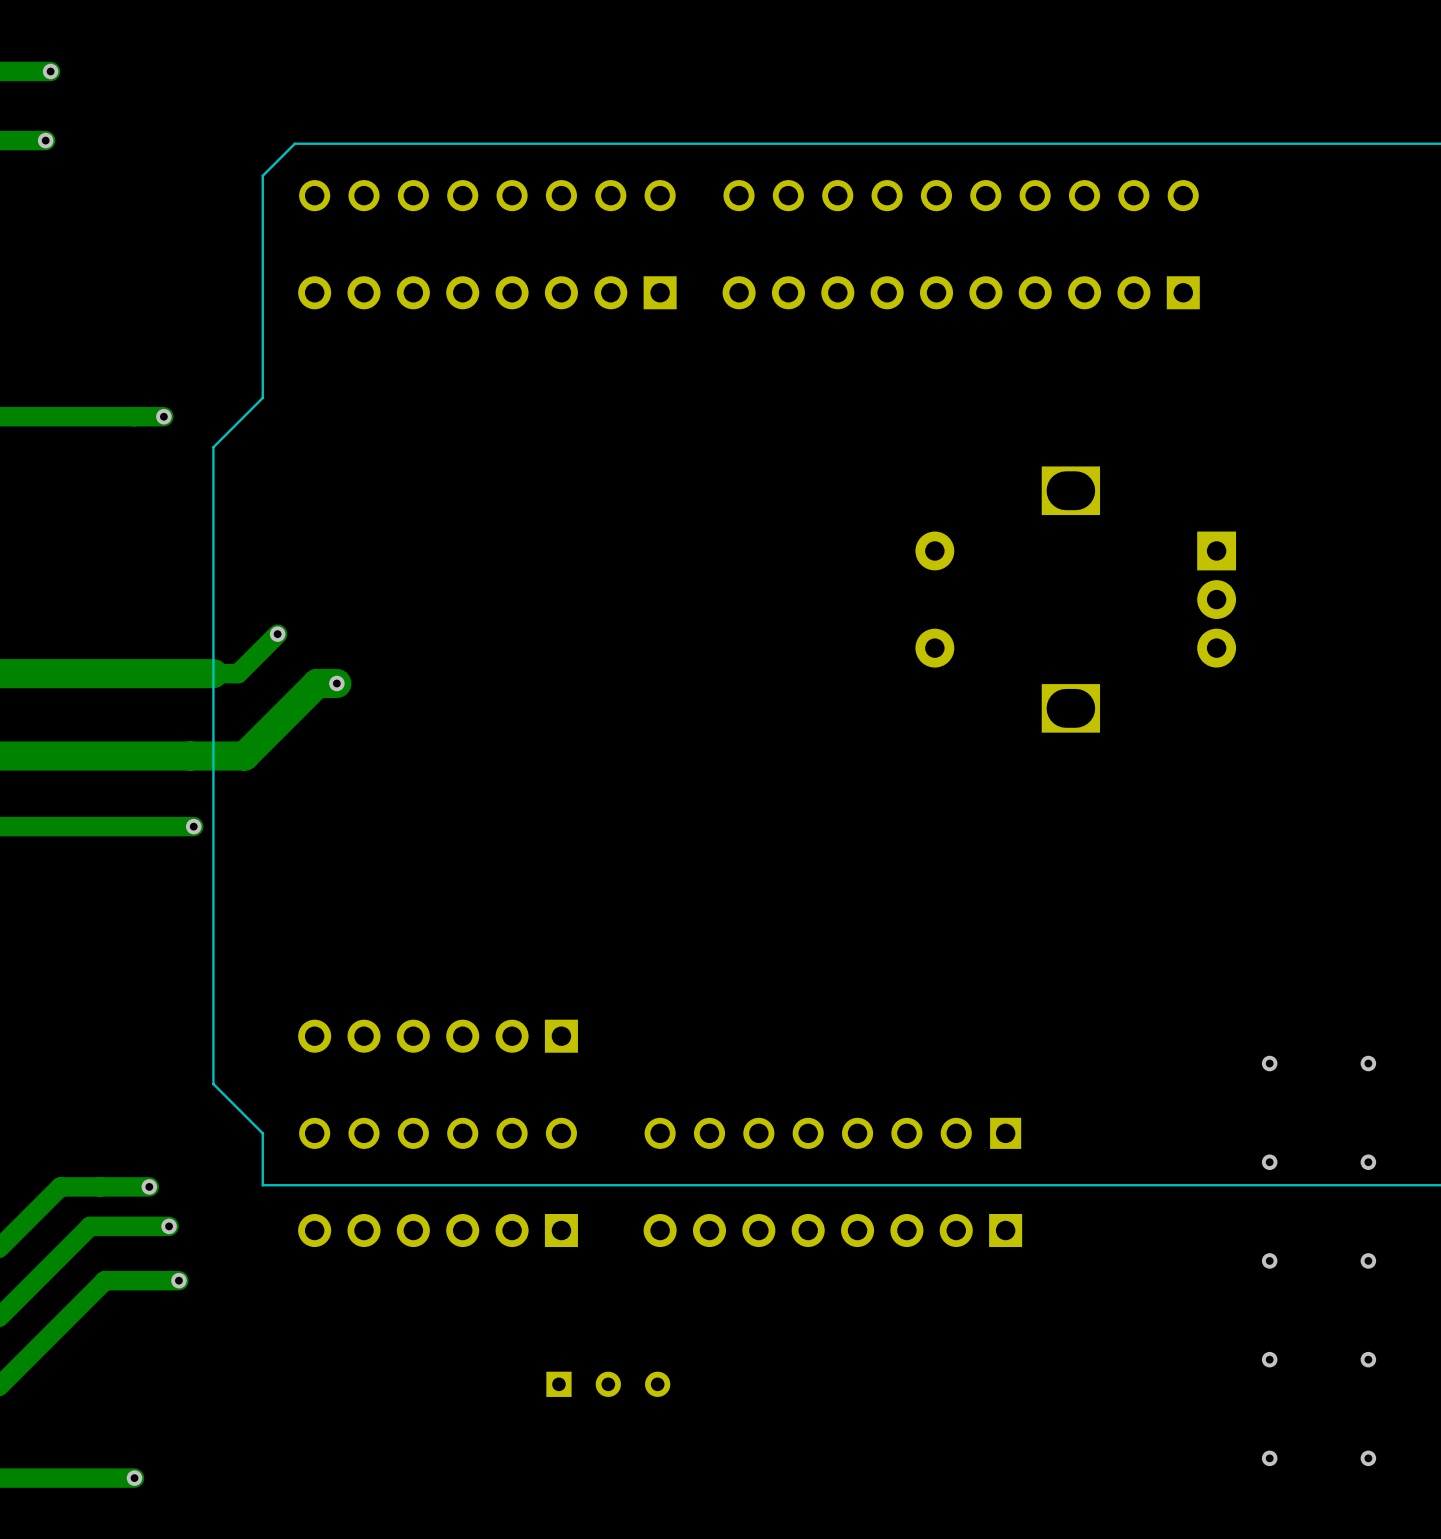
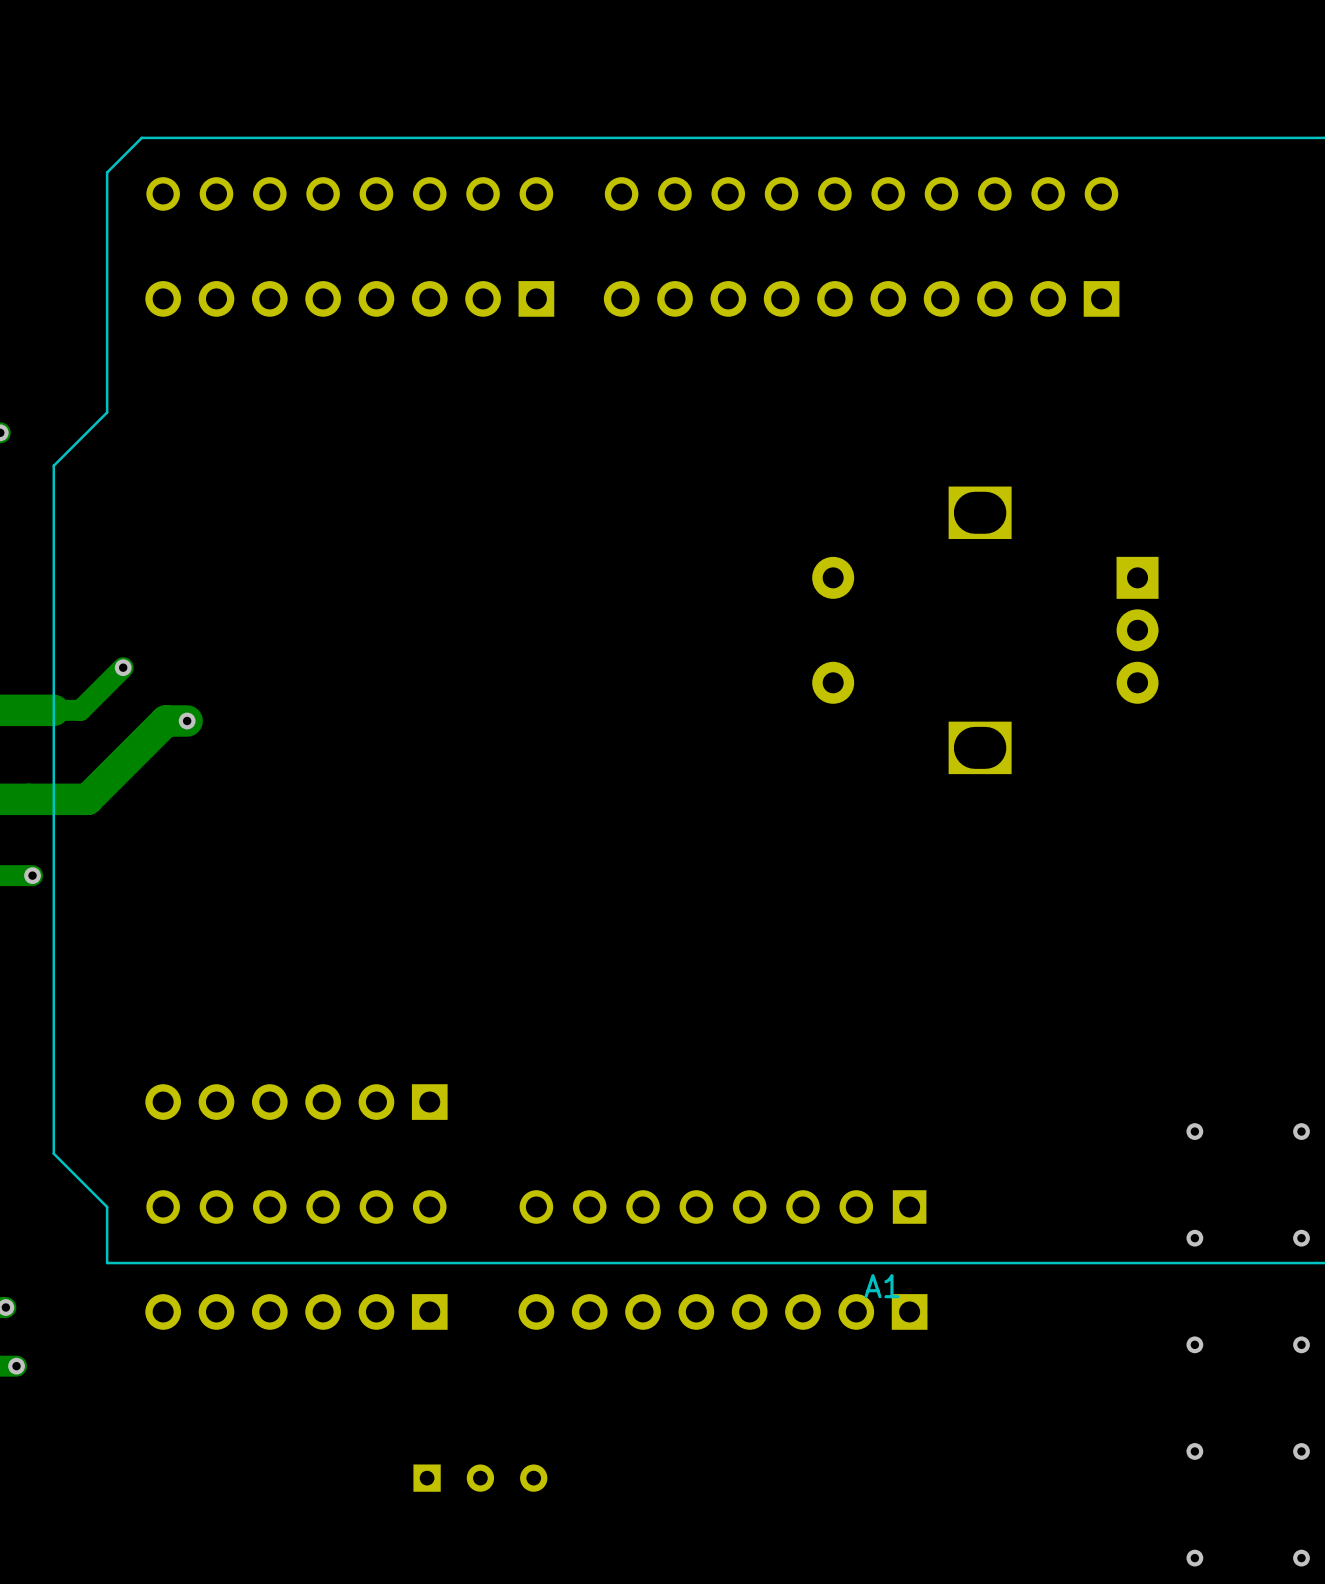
A1 name: none -> A1 (881, 1286)

